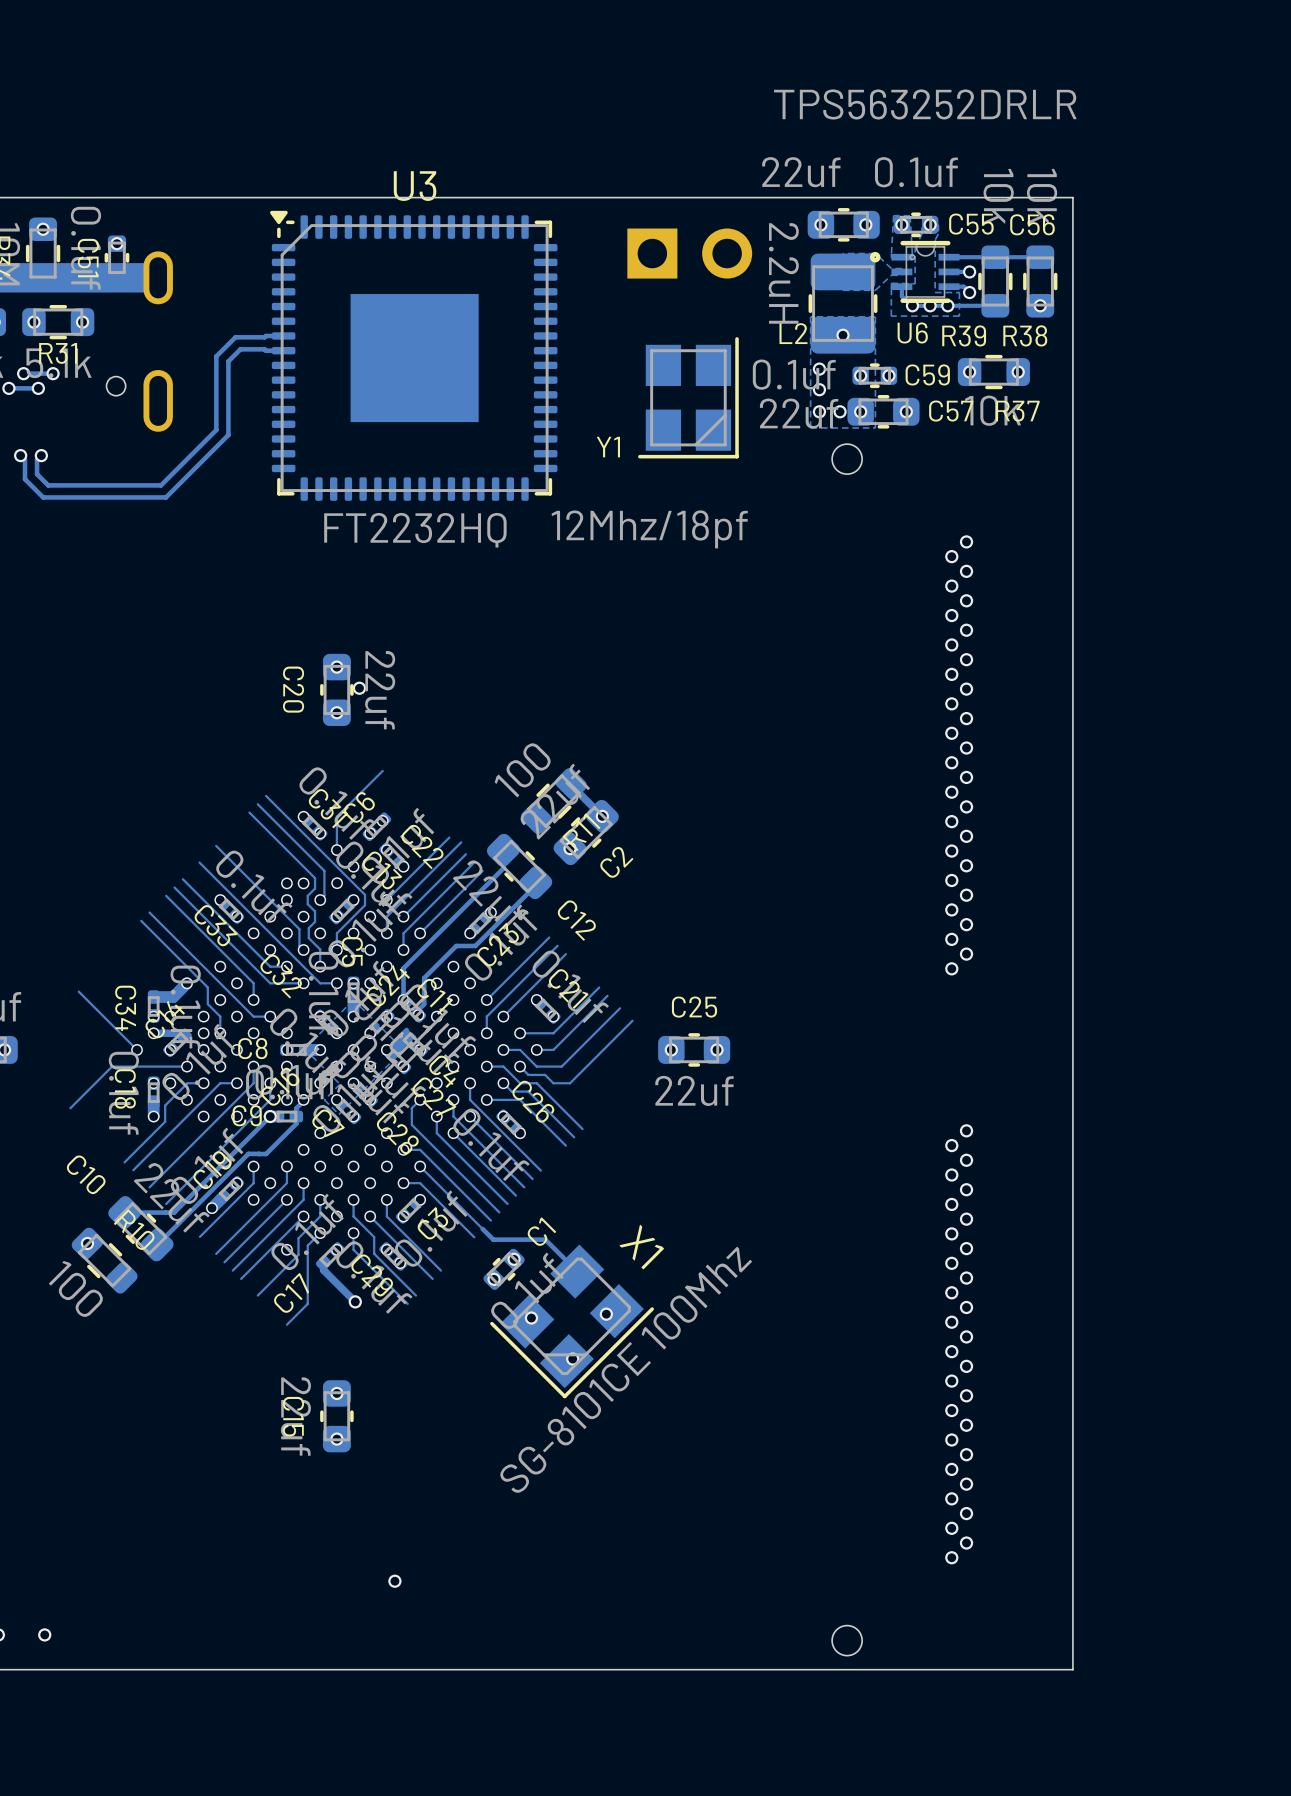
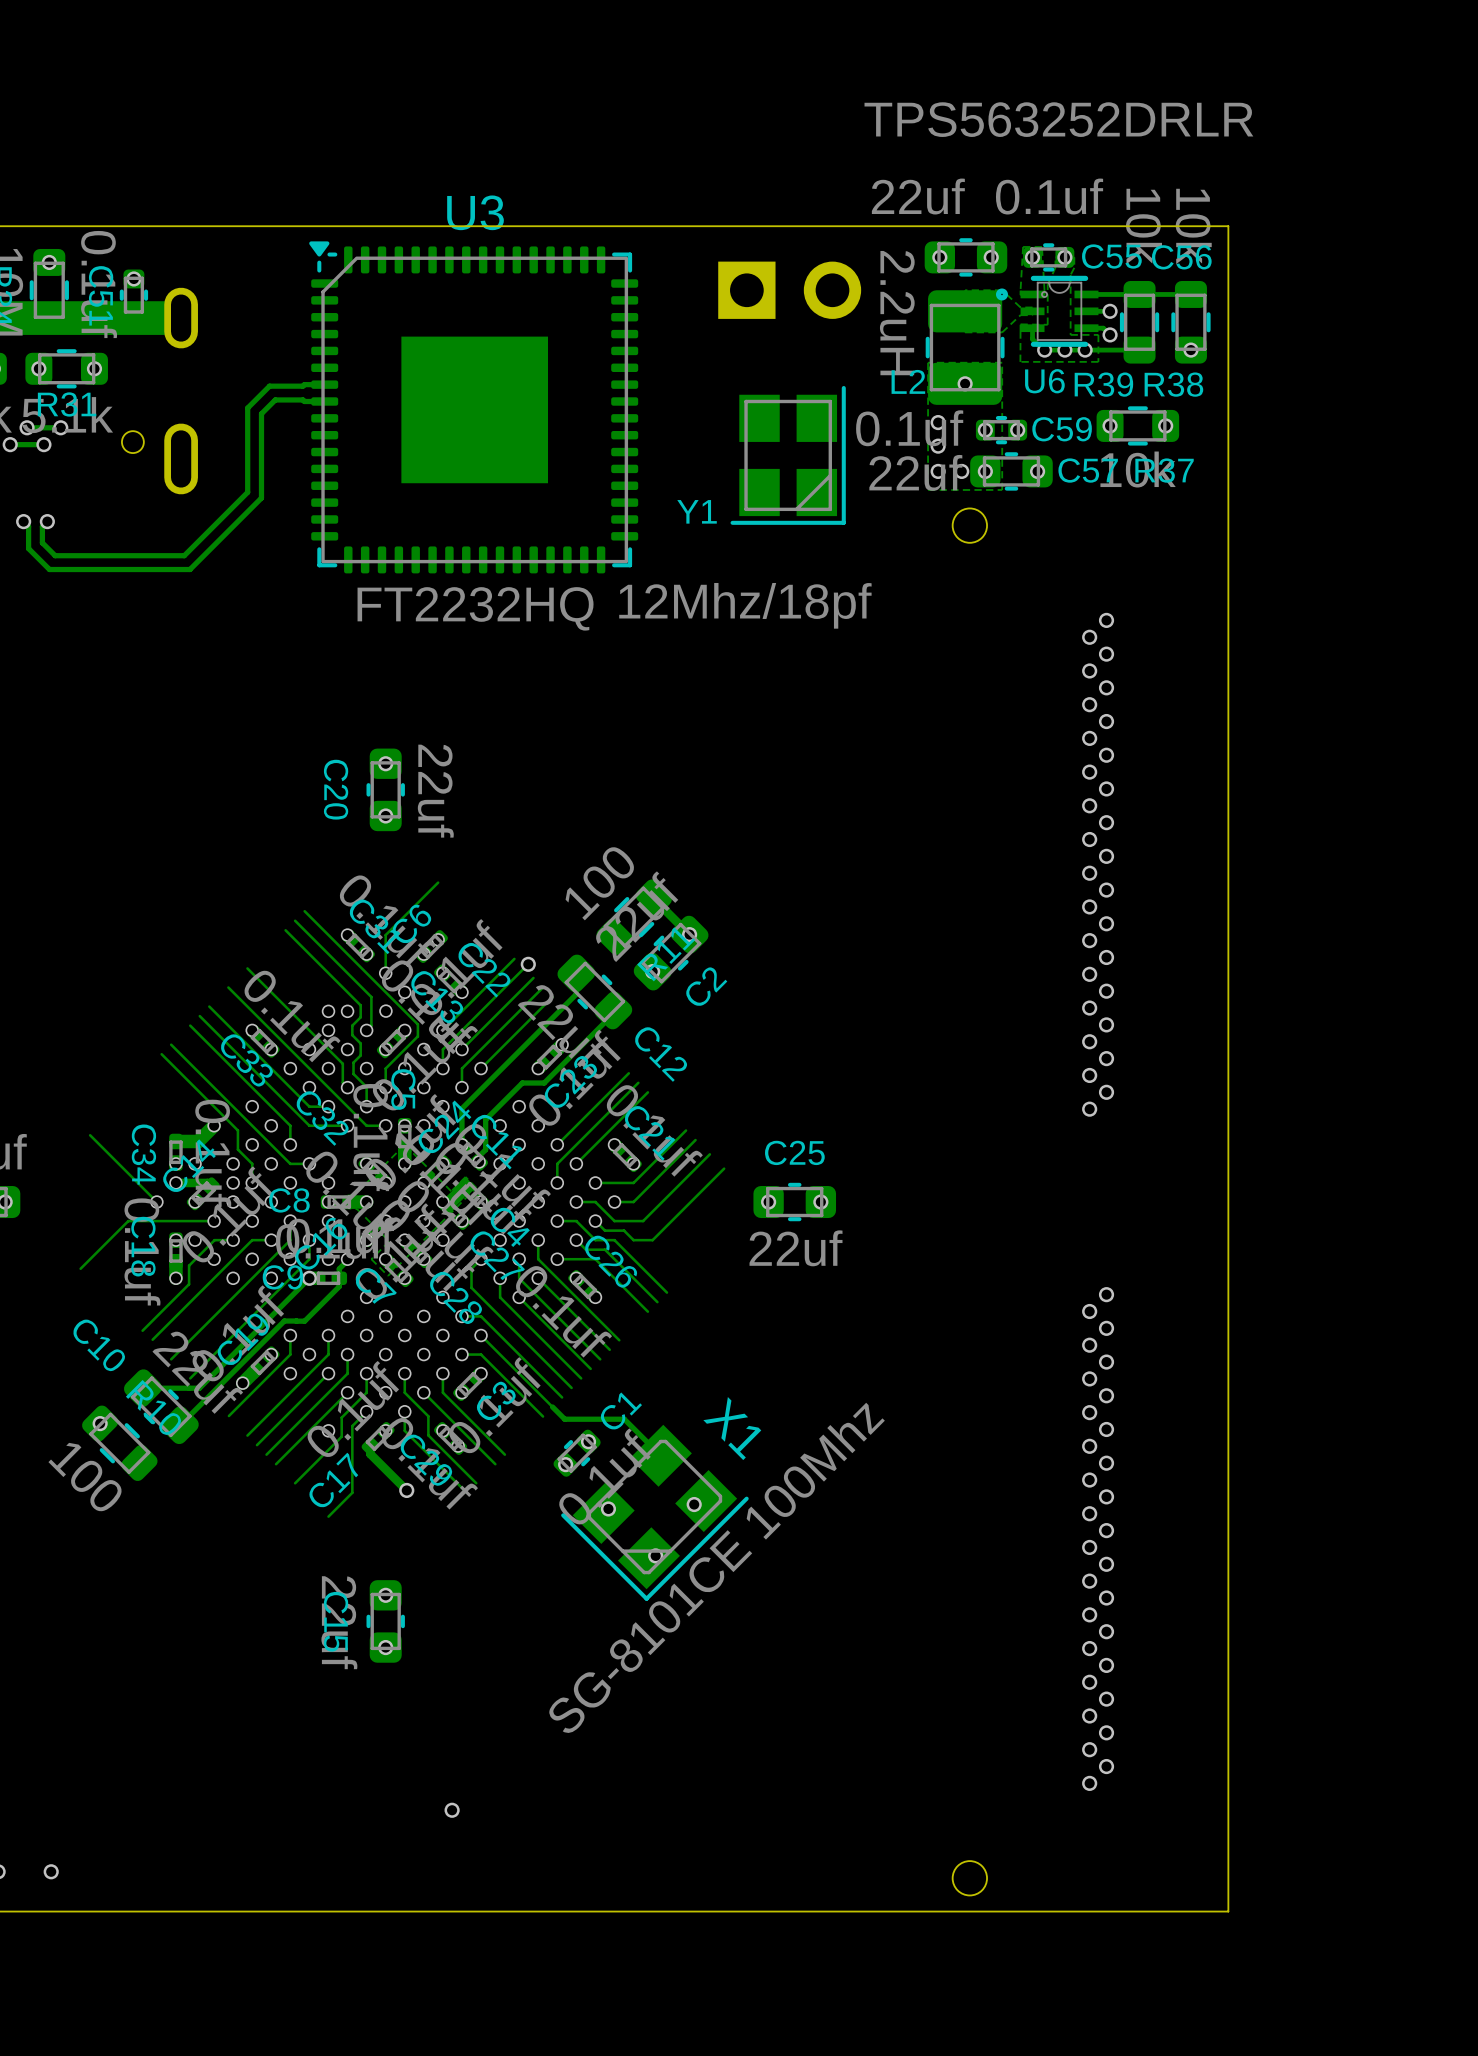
via: (359, 688) -> none
via: none -> (528, 964)

